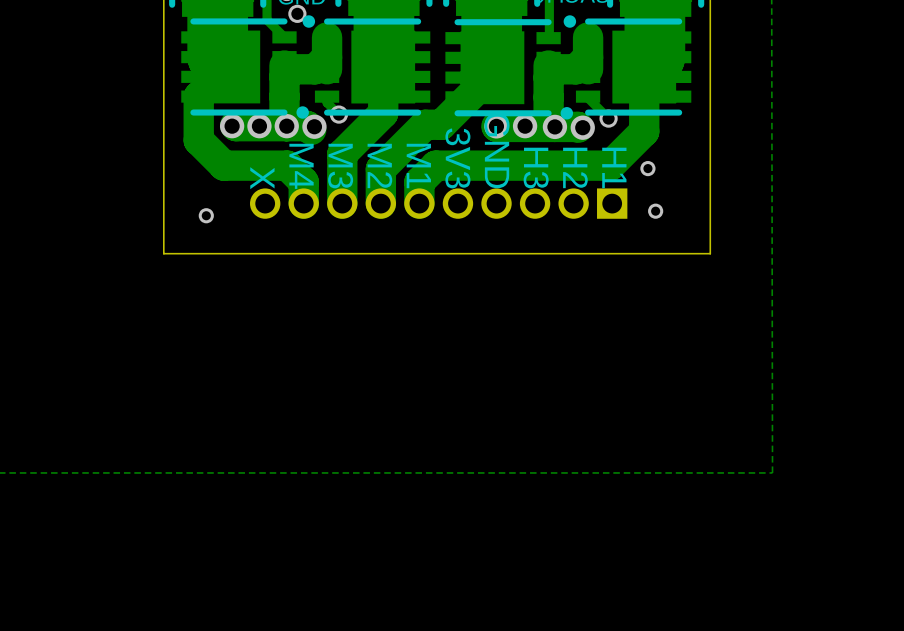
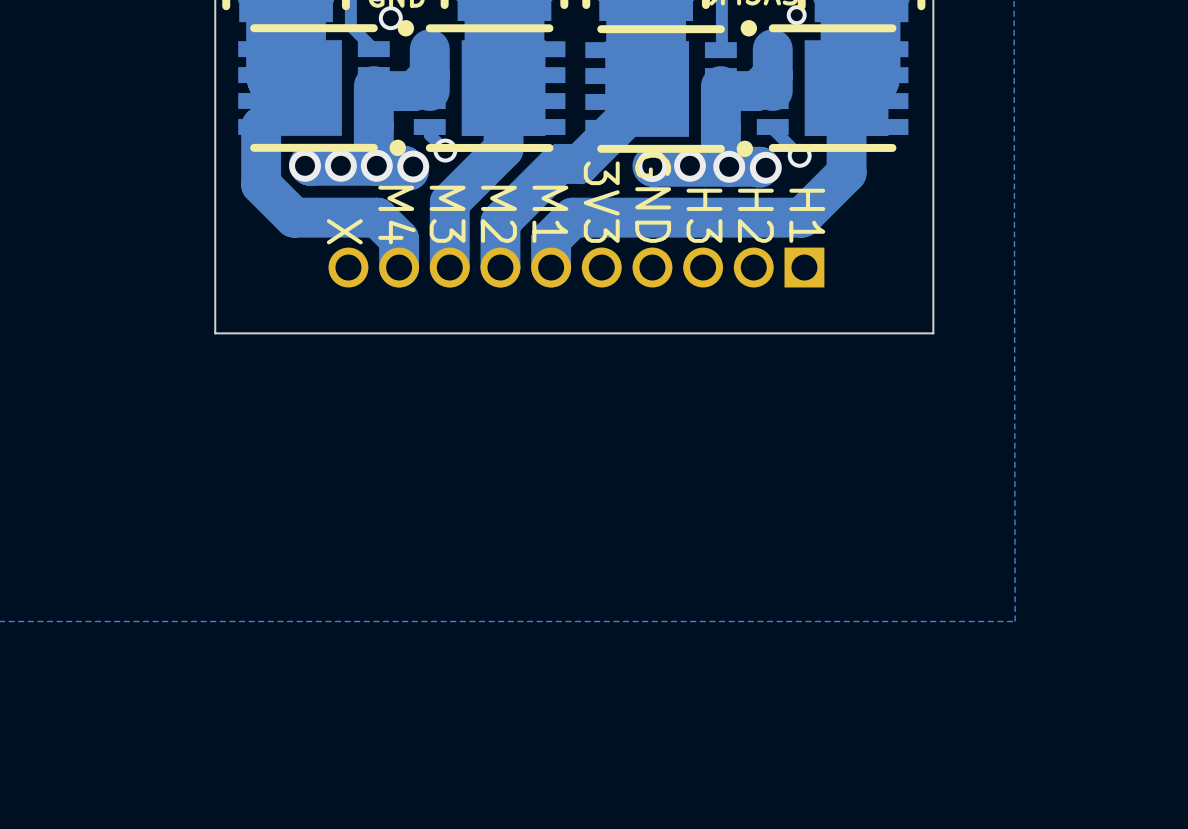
via: none -> (796, 15)
via: (647, 168) -> none
via: (655, 211) -> none
via: (206, 215) -> none

